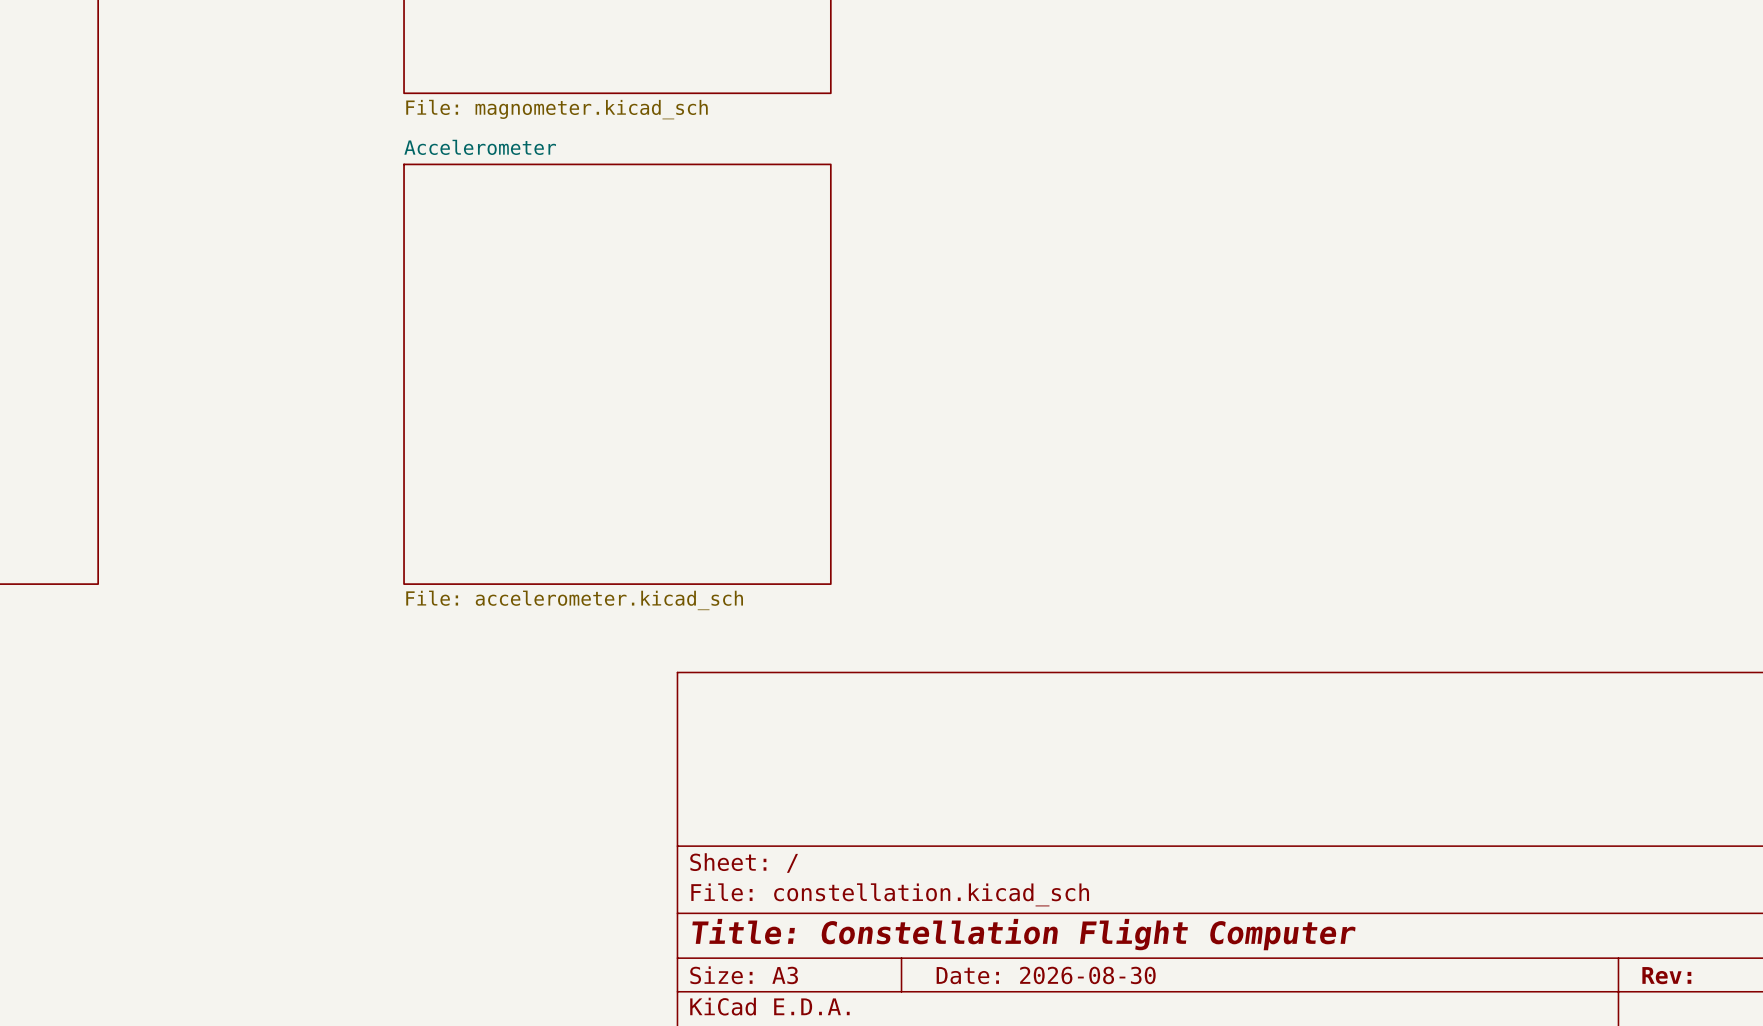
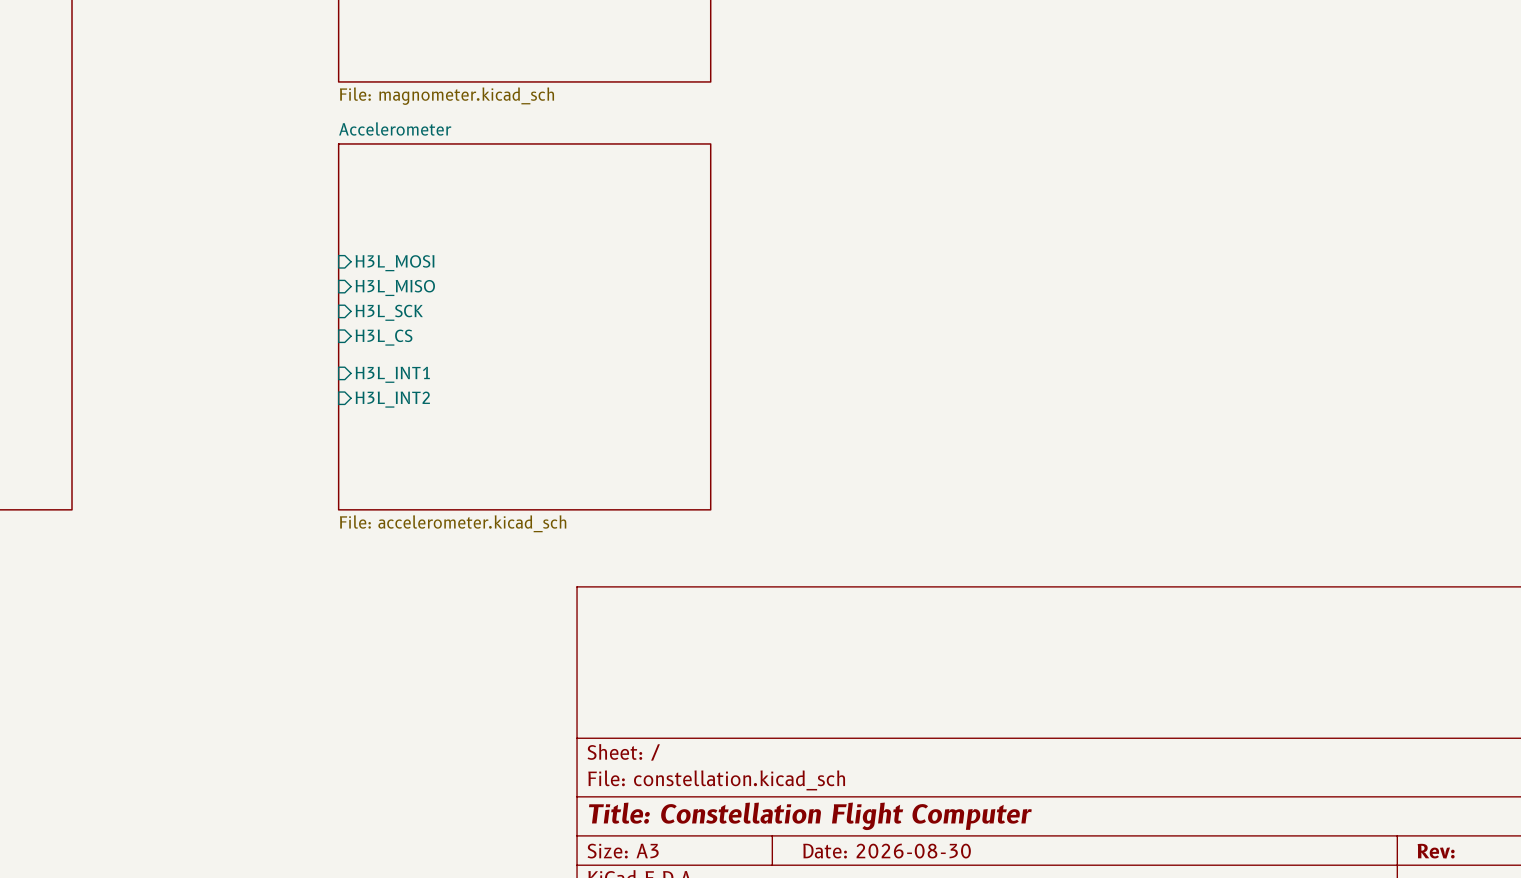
sheet pin: none -> H3L_MOSI (394, 263)
sheet pin: none -> H3L_MISO (395, 287)
sheet pin: none -> H3L_SCK (389, 312)
sheet pin: none -> H3L_CS (384, 337)
sheet pin: none -> H3L_INT1 (392, 374)
sheet pin: none -> H3L_INT2 (392, 399)

